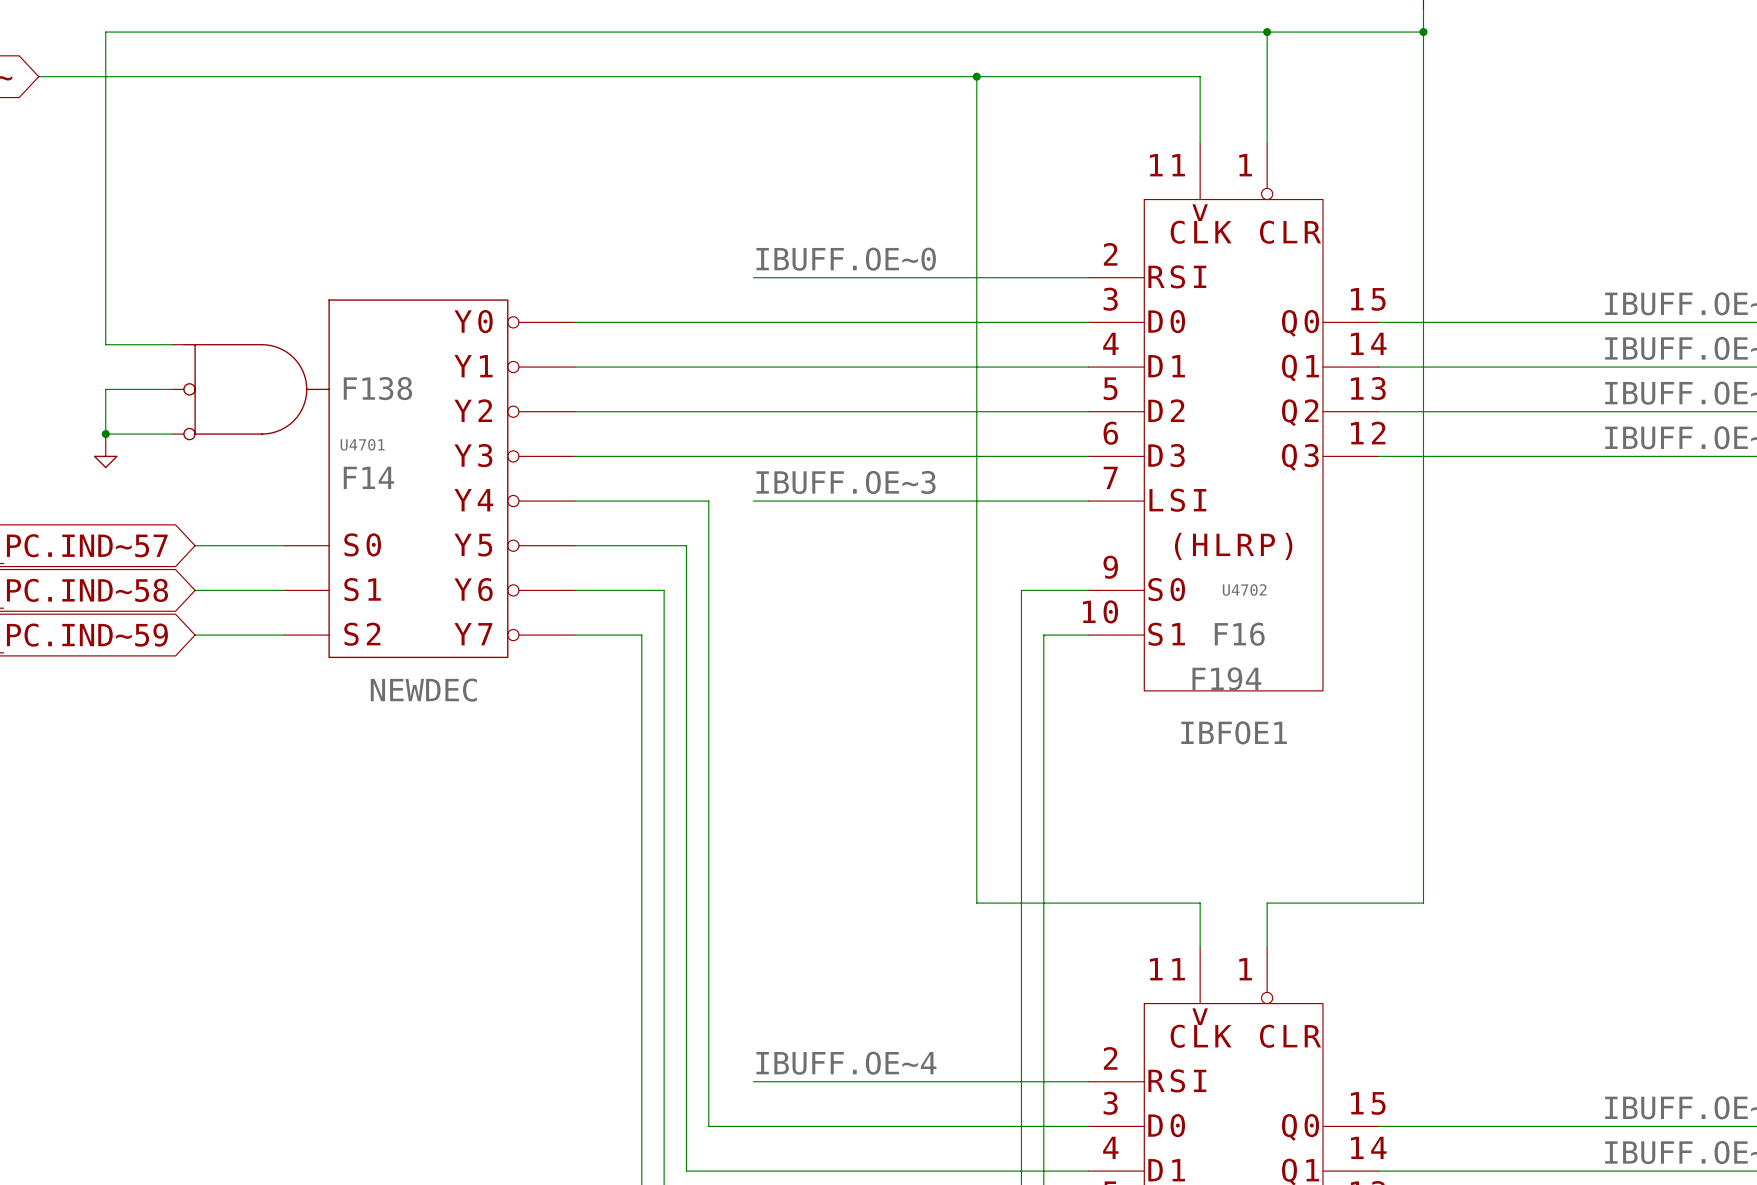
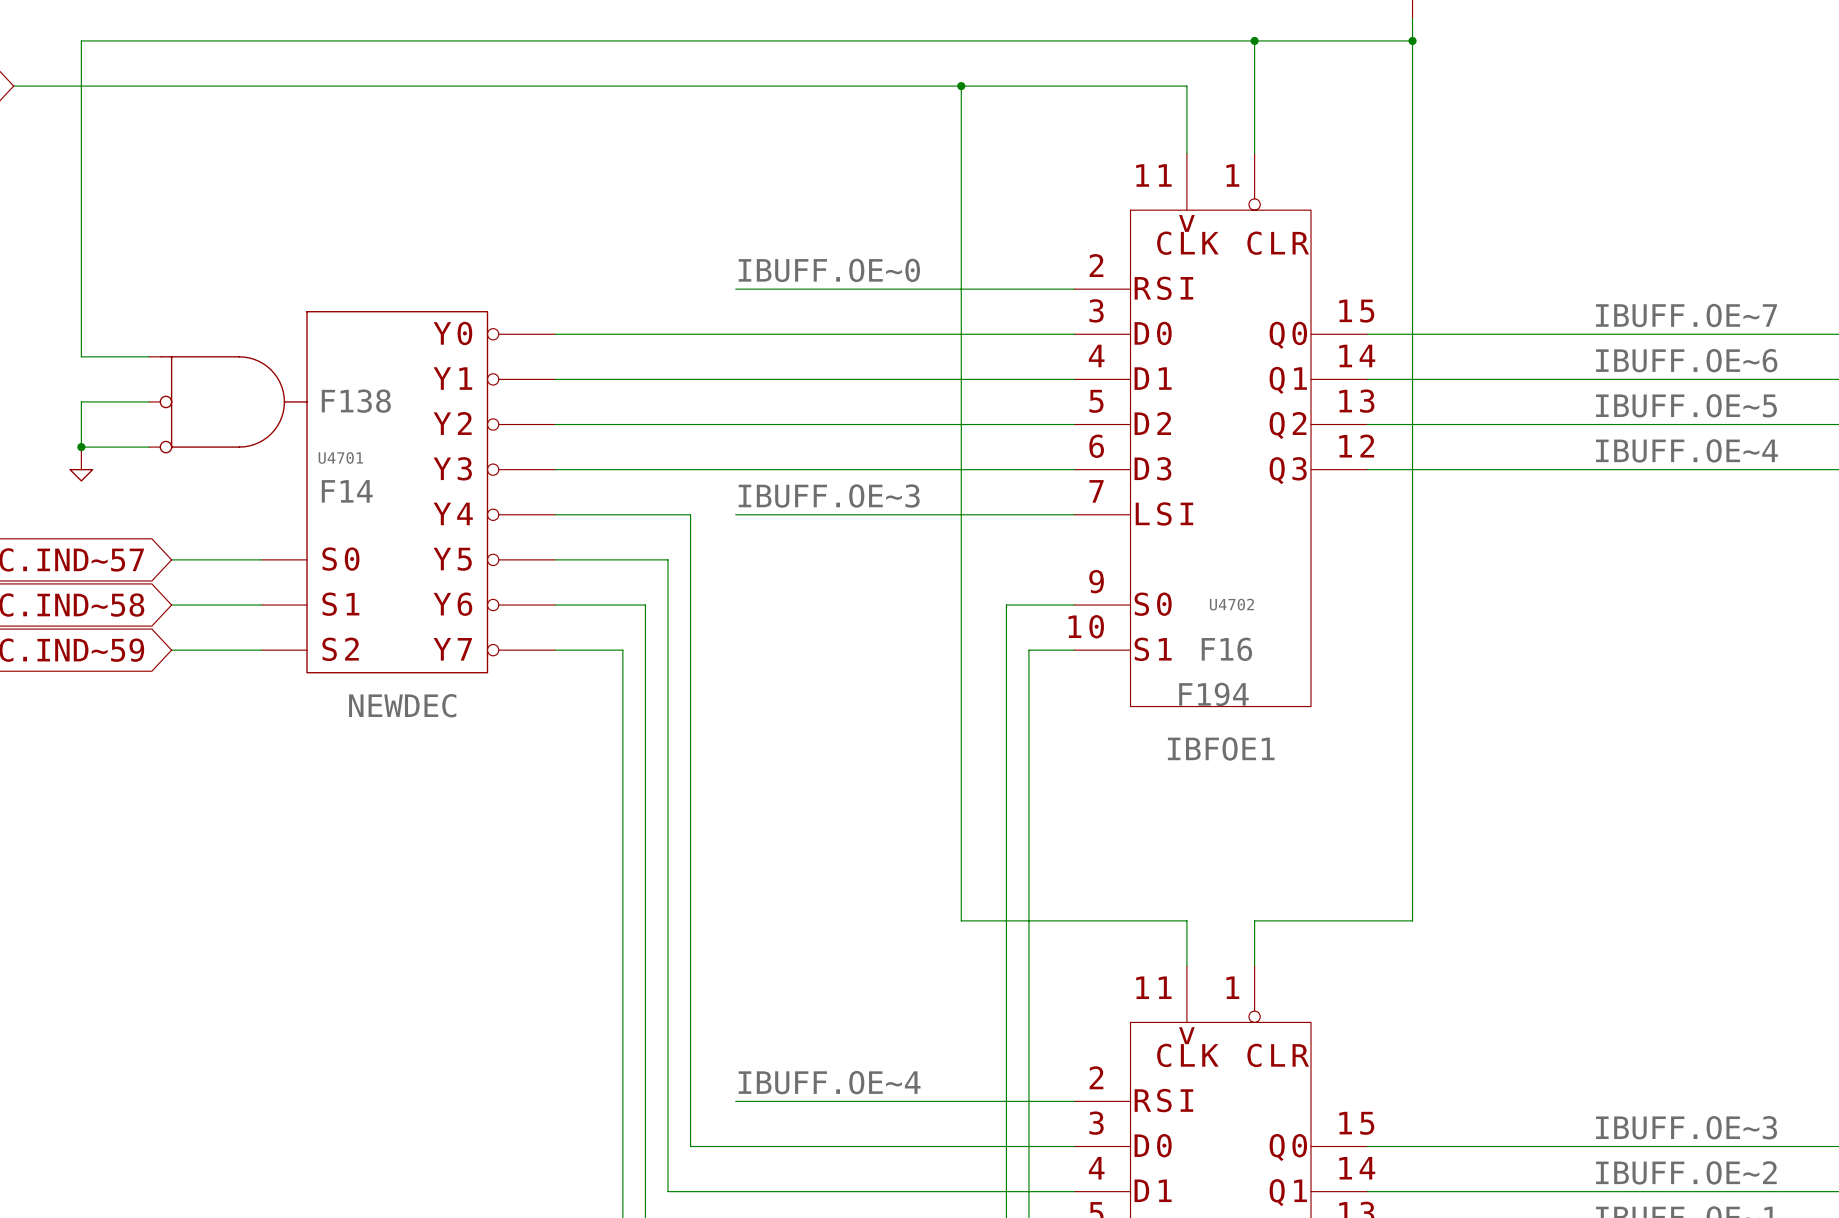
U4702 text: H (1200, 544) -> none
U4702 text: L (1223, 544) -> none
U4702 text: R (1245, 544) -> none
U4702 text: P (1267, 544) -> none
U4702 text: ( (1178, 546) -> none
U4702 text: ) (1288, 546) -> none

